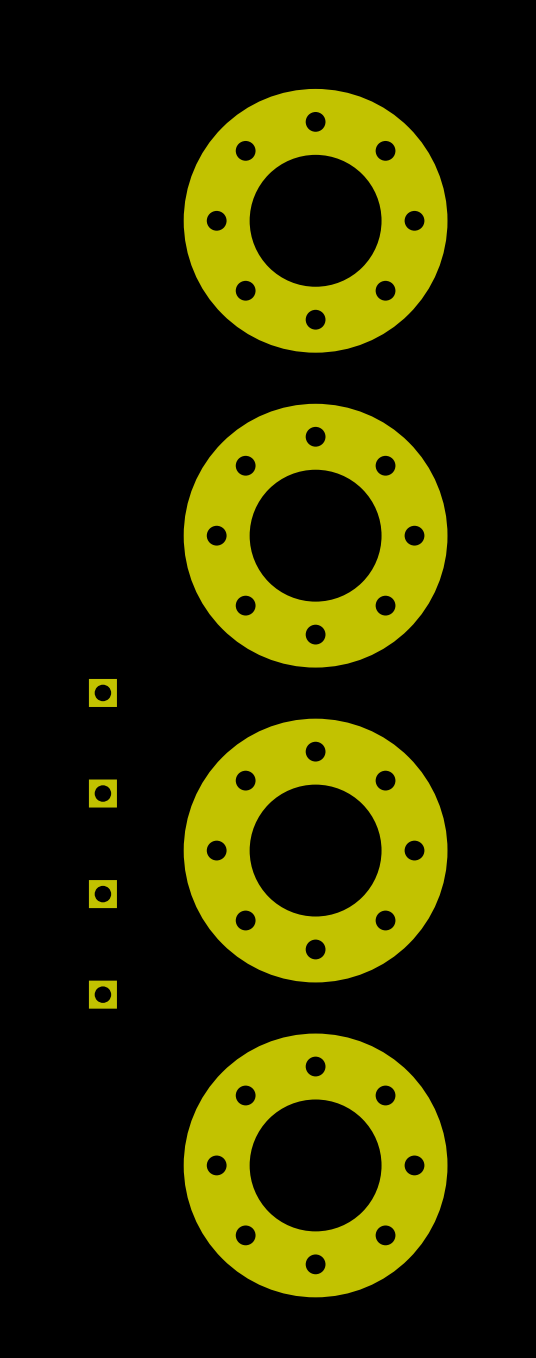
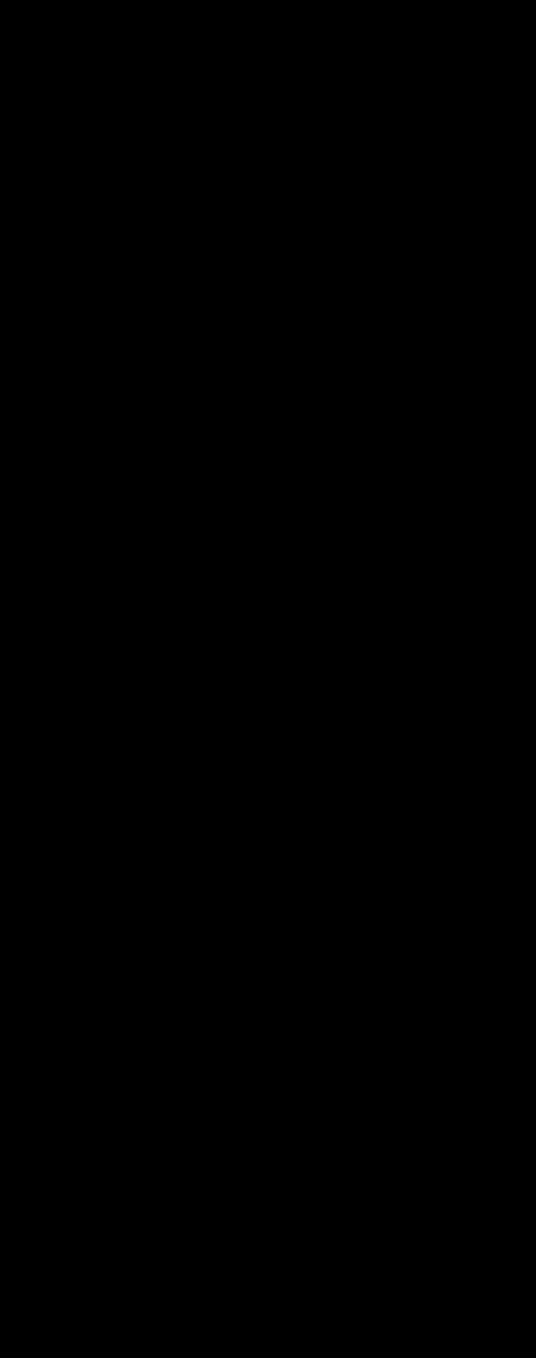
part: (315, 220) -> none
part: (315, 535) -> none
part: (102, 692) -> none
part: (102, 793) -> none
part: (315, 850) -> none
part: (102, 894) -> none
part: (102, 994) -> none
part: (315, 1165) -> none

